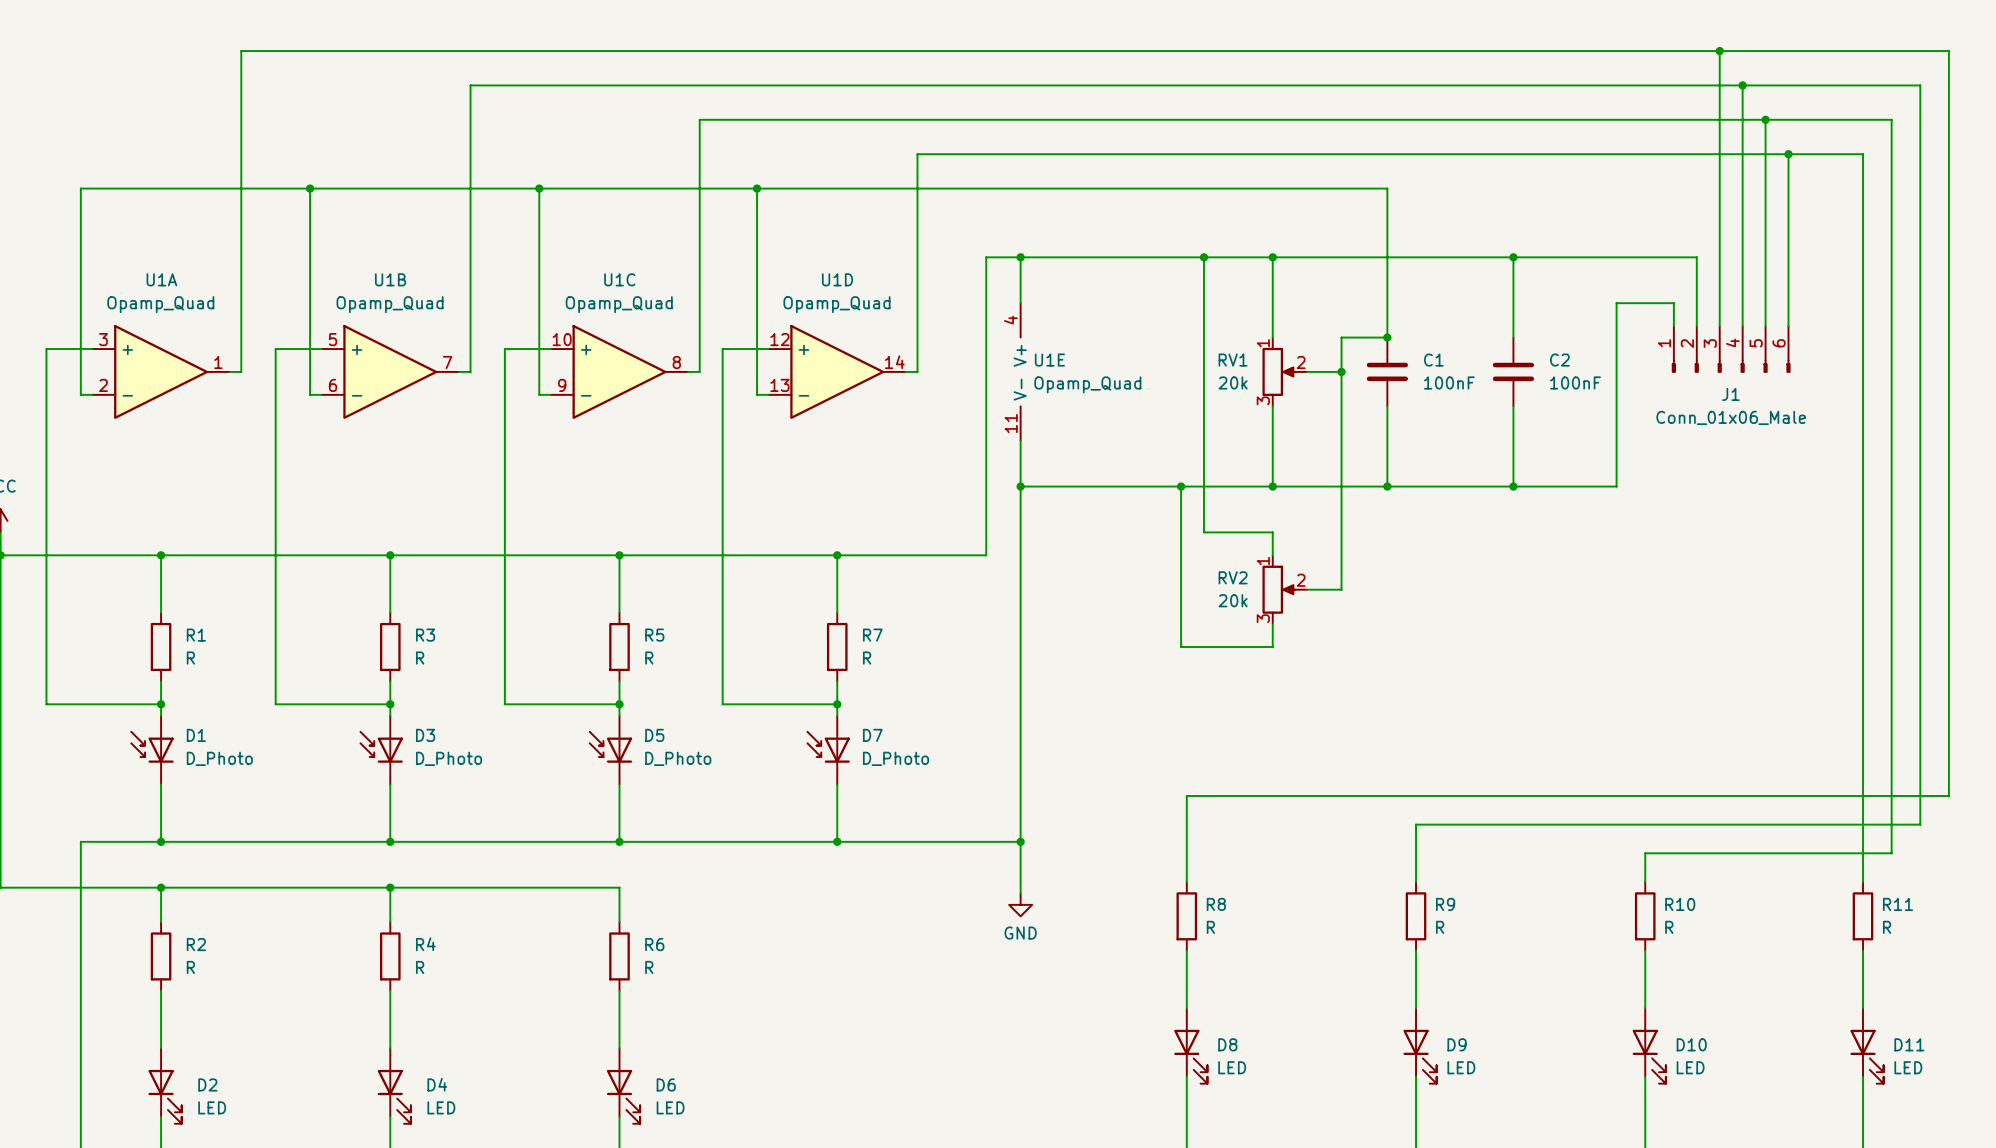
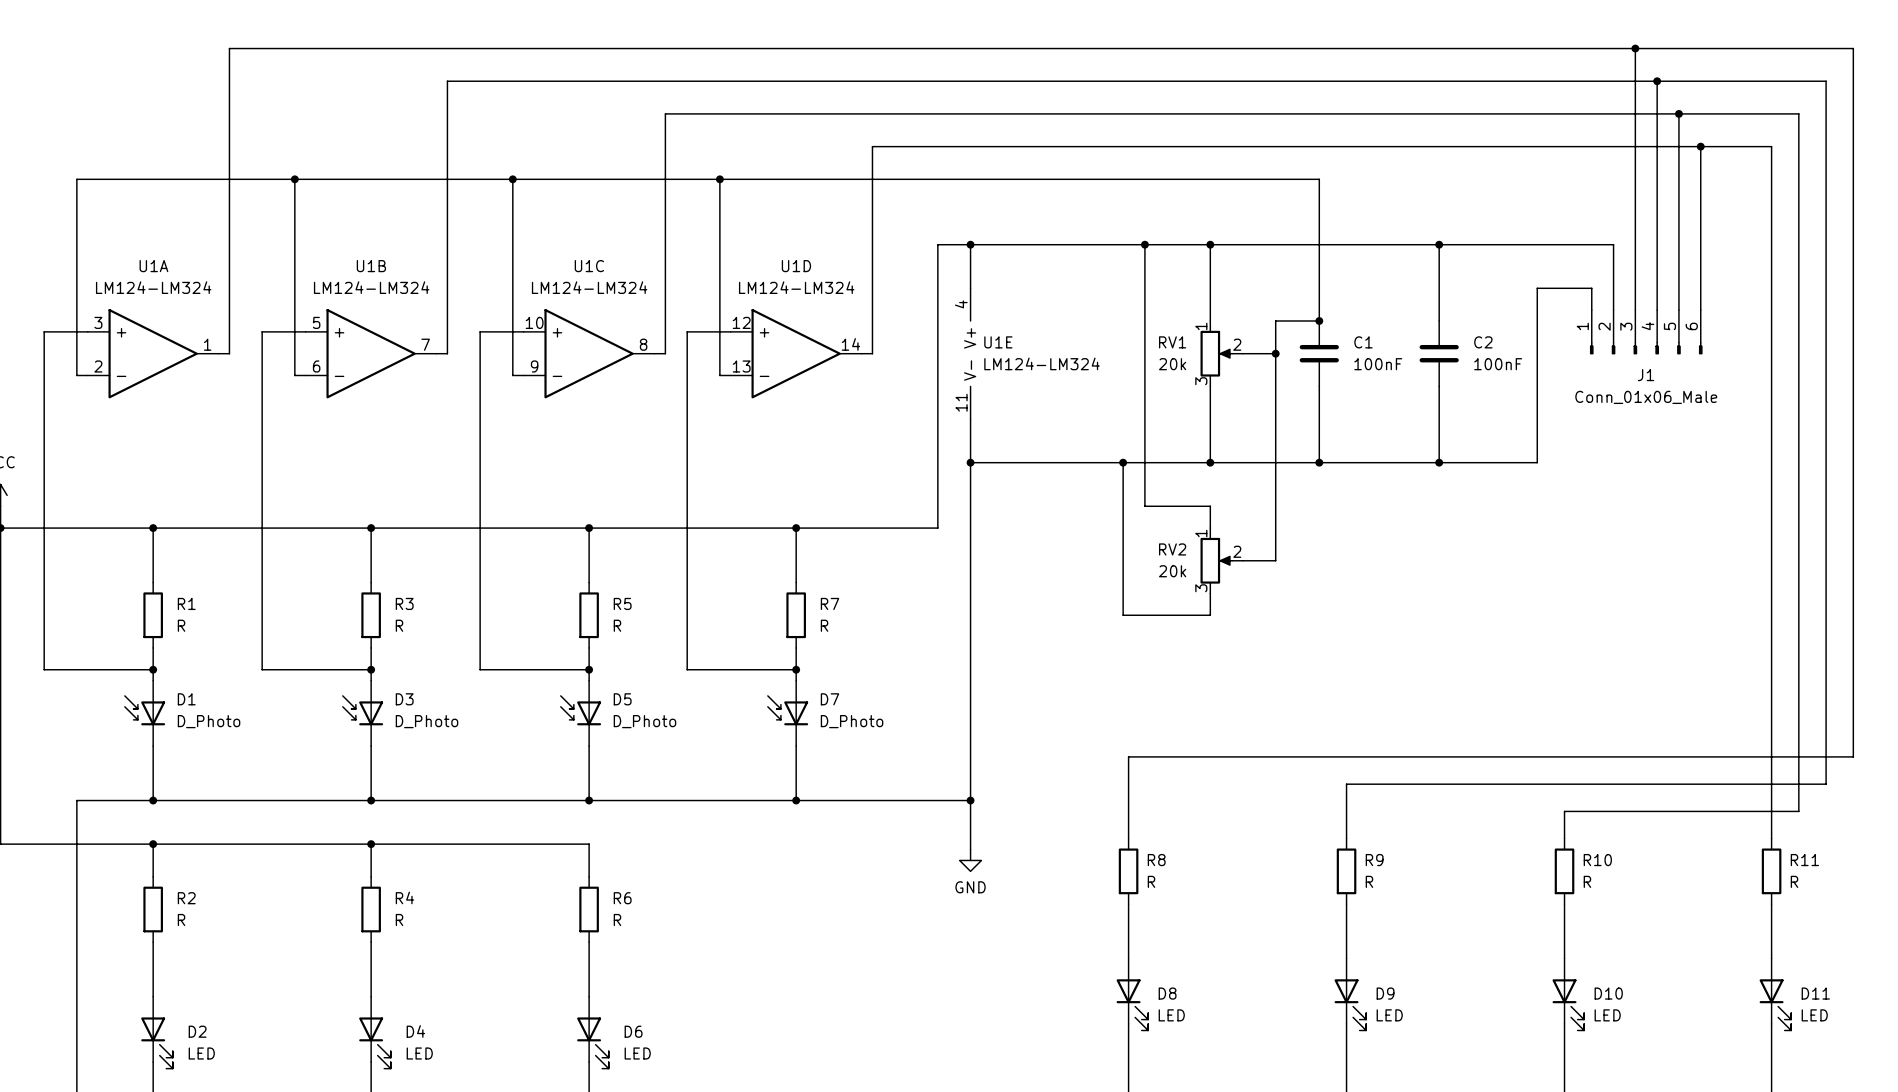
U1A value: Opamp_Quad (160, 304) -> LM124-LM324 (153, 287)
U1B value: Opamp_Quad (390, 304) -> LM124-LM324 (371, 287)
U1C value: Opamp_Quad (619, 304) -> LM124-LM324 (589, 287)
U1D value: Opamp_Quad (836, 304) -> LM124-LM324 (796, 287)
U1E value: Opamp_Quad (1087, 384) -> LM124-LM324 (1041, 363)

